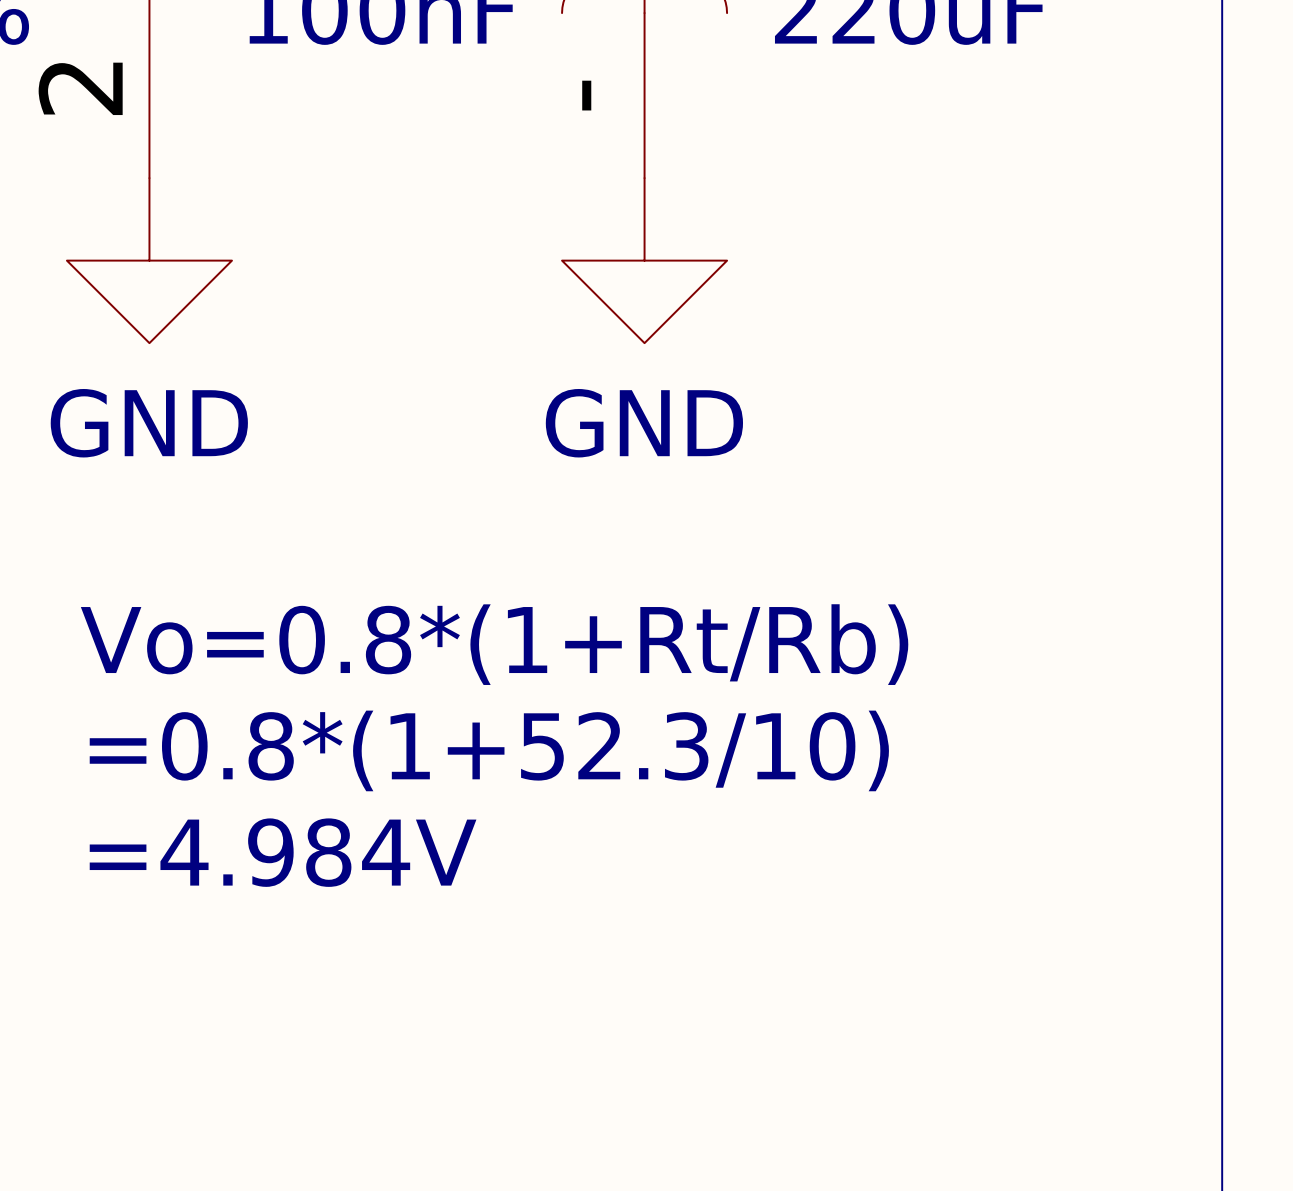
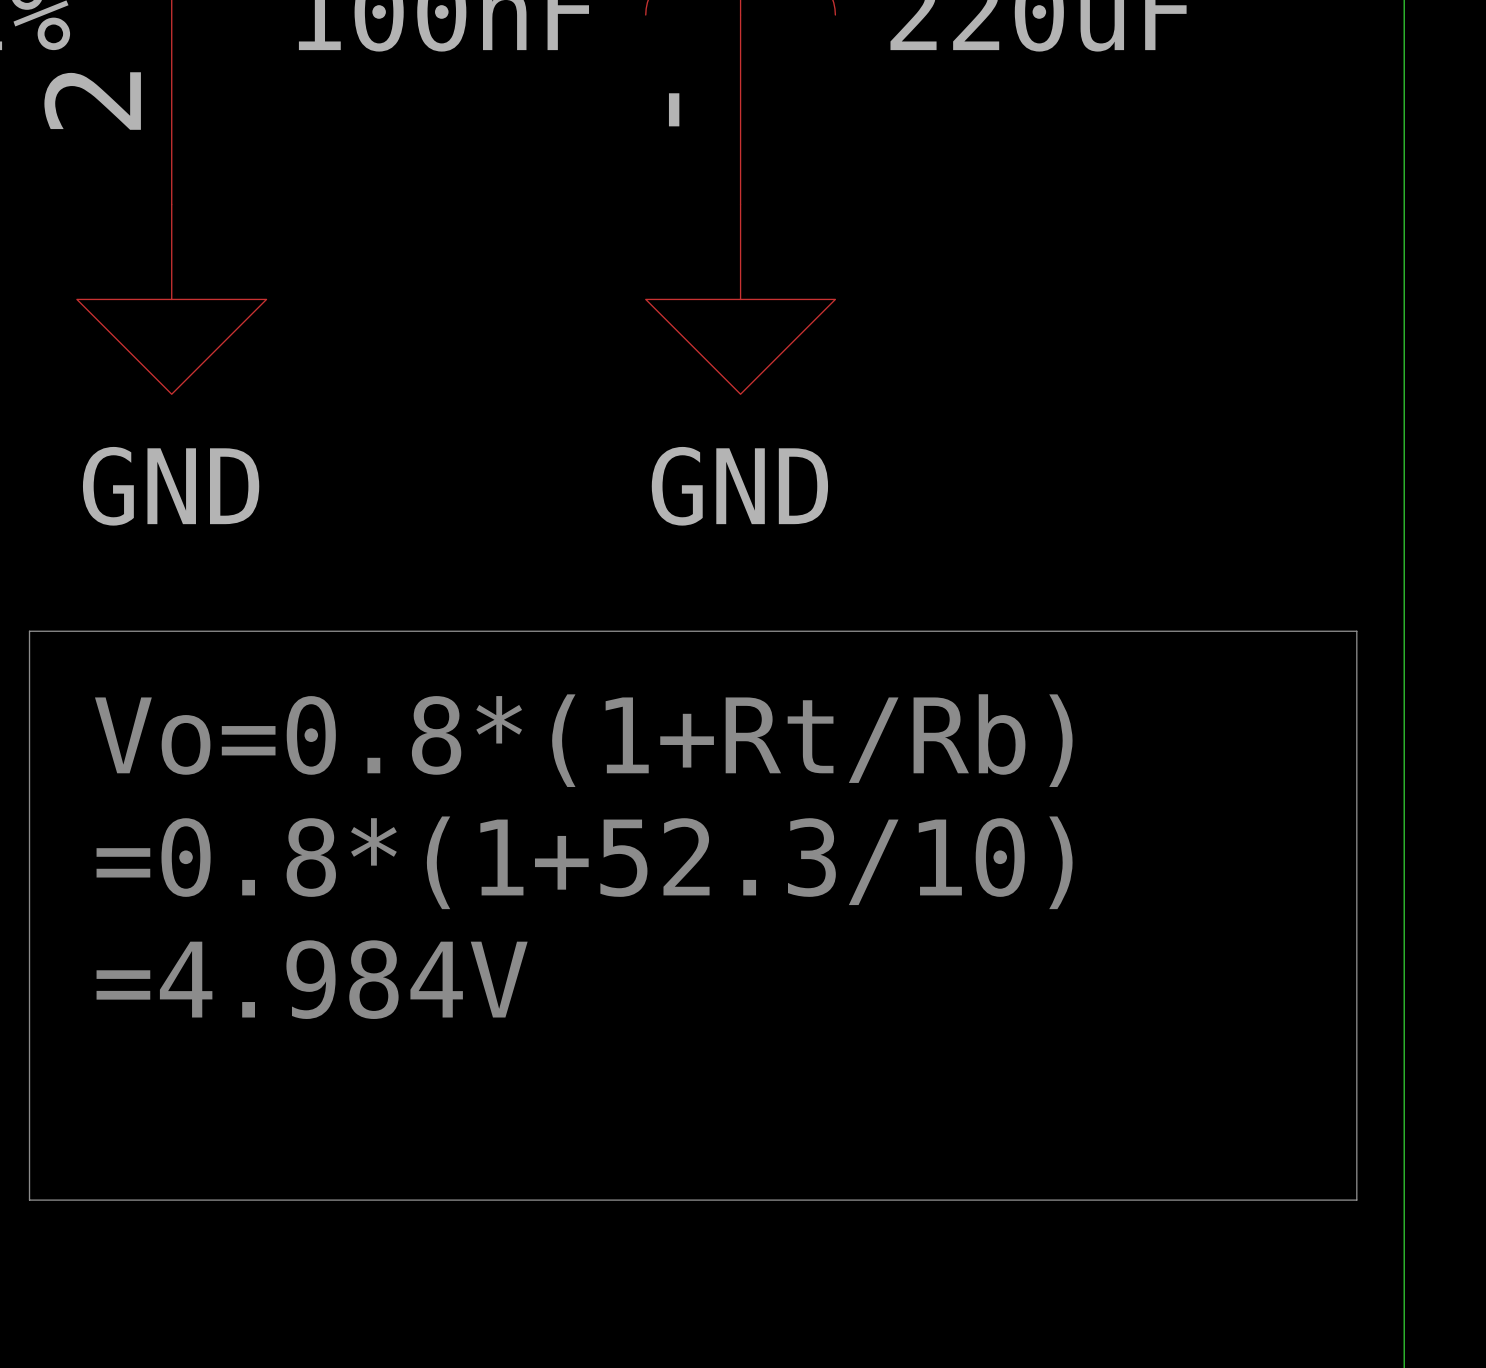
line: none -> (29, 631) (1356, 631) (1356, 1200) (29, 1200) (29, 631)

